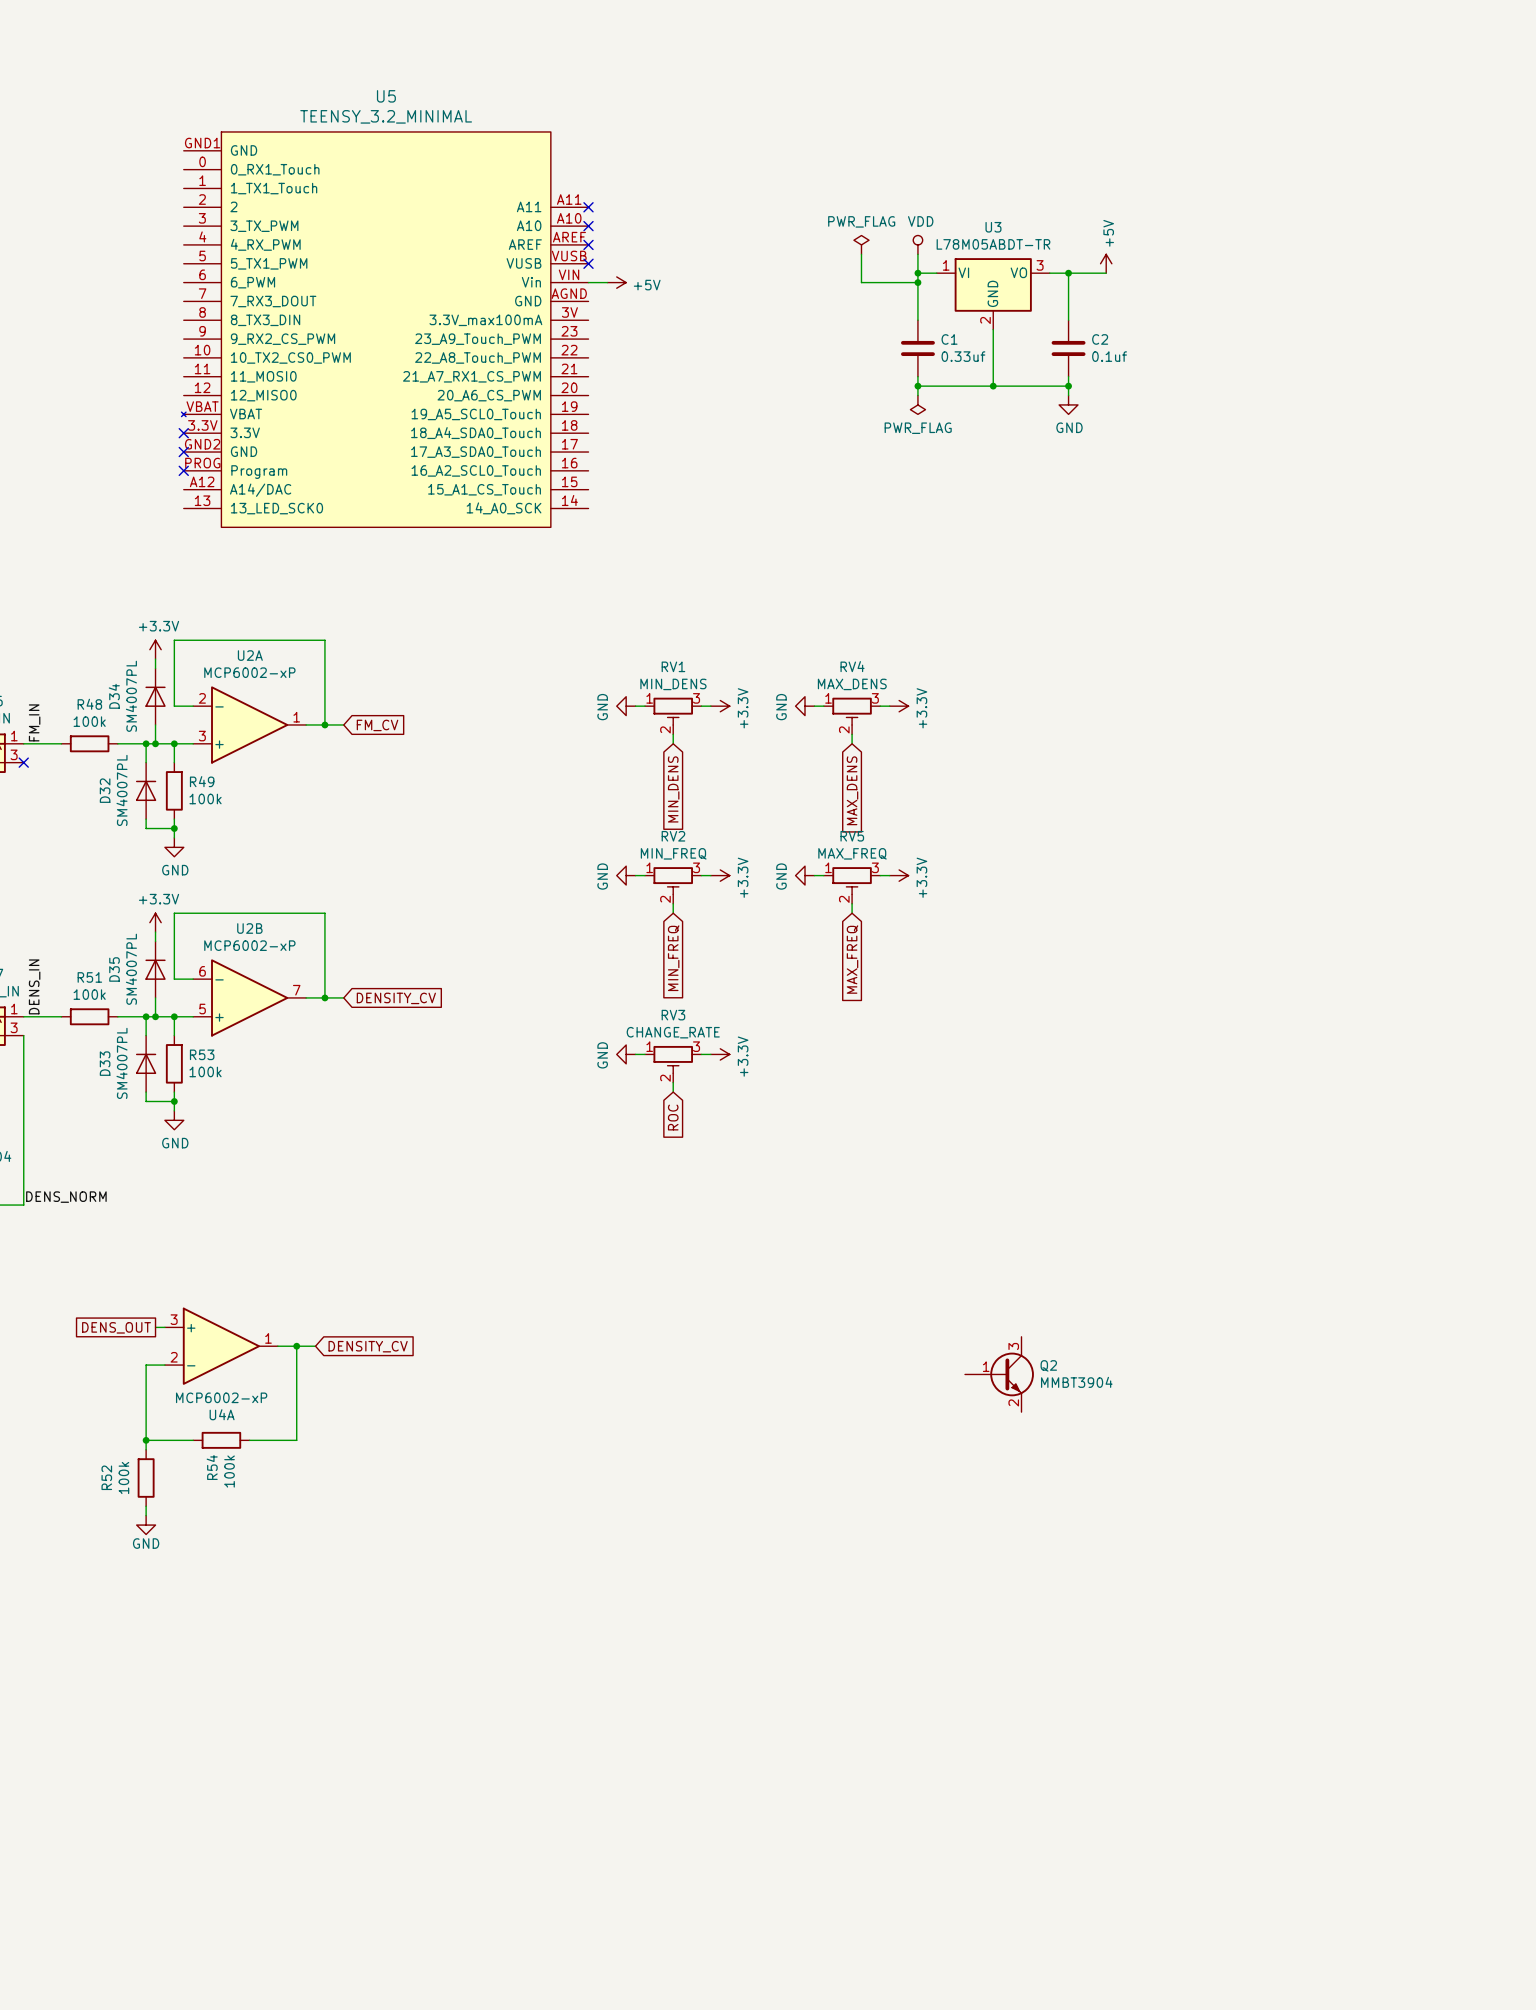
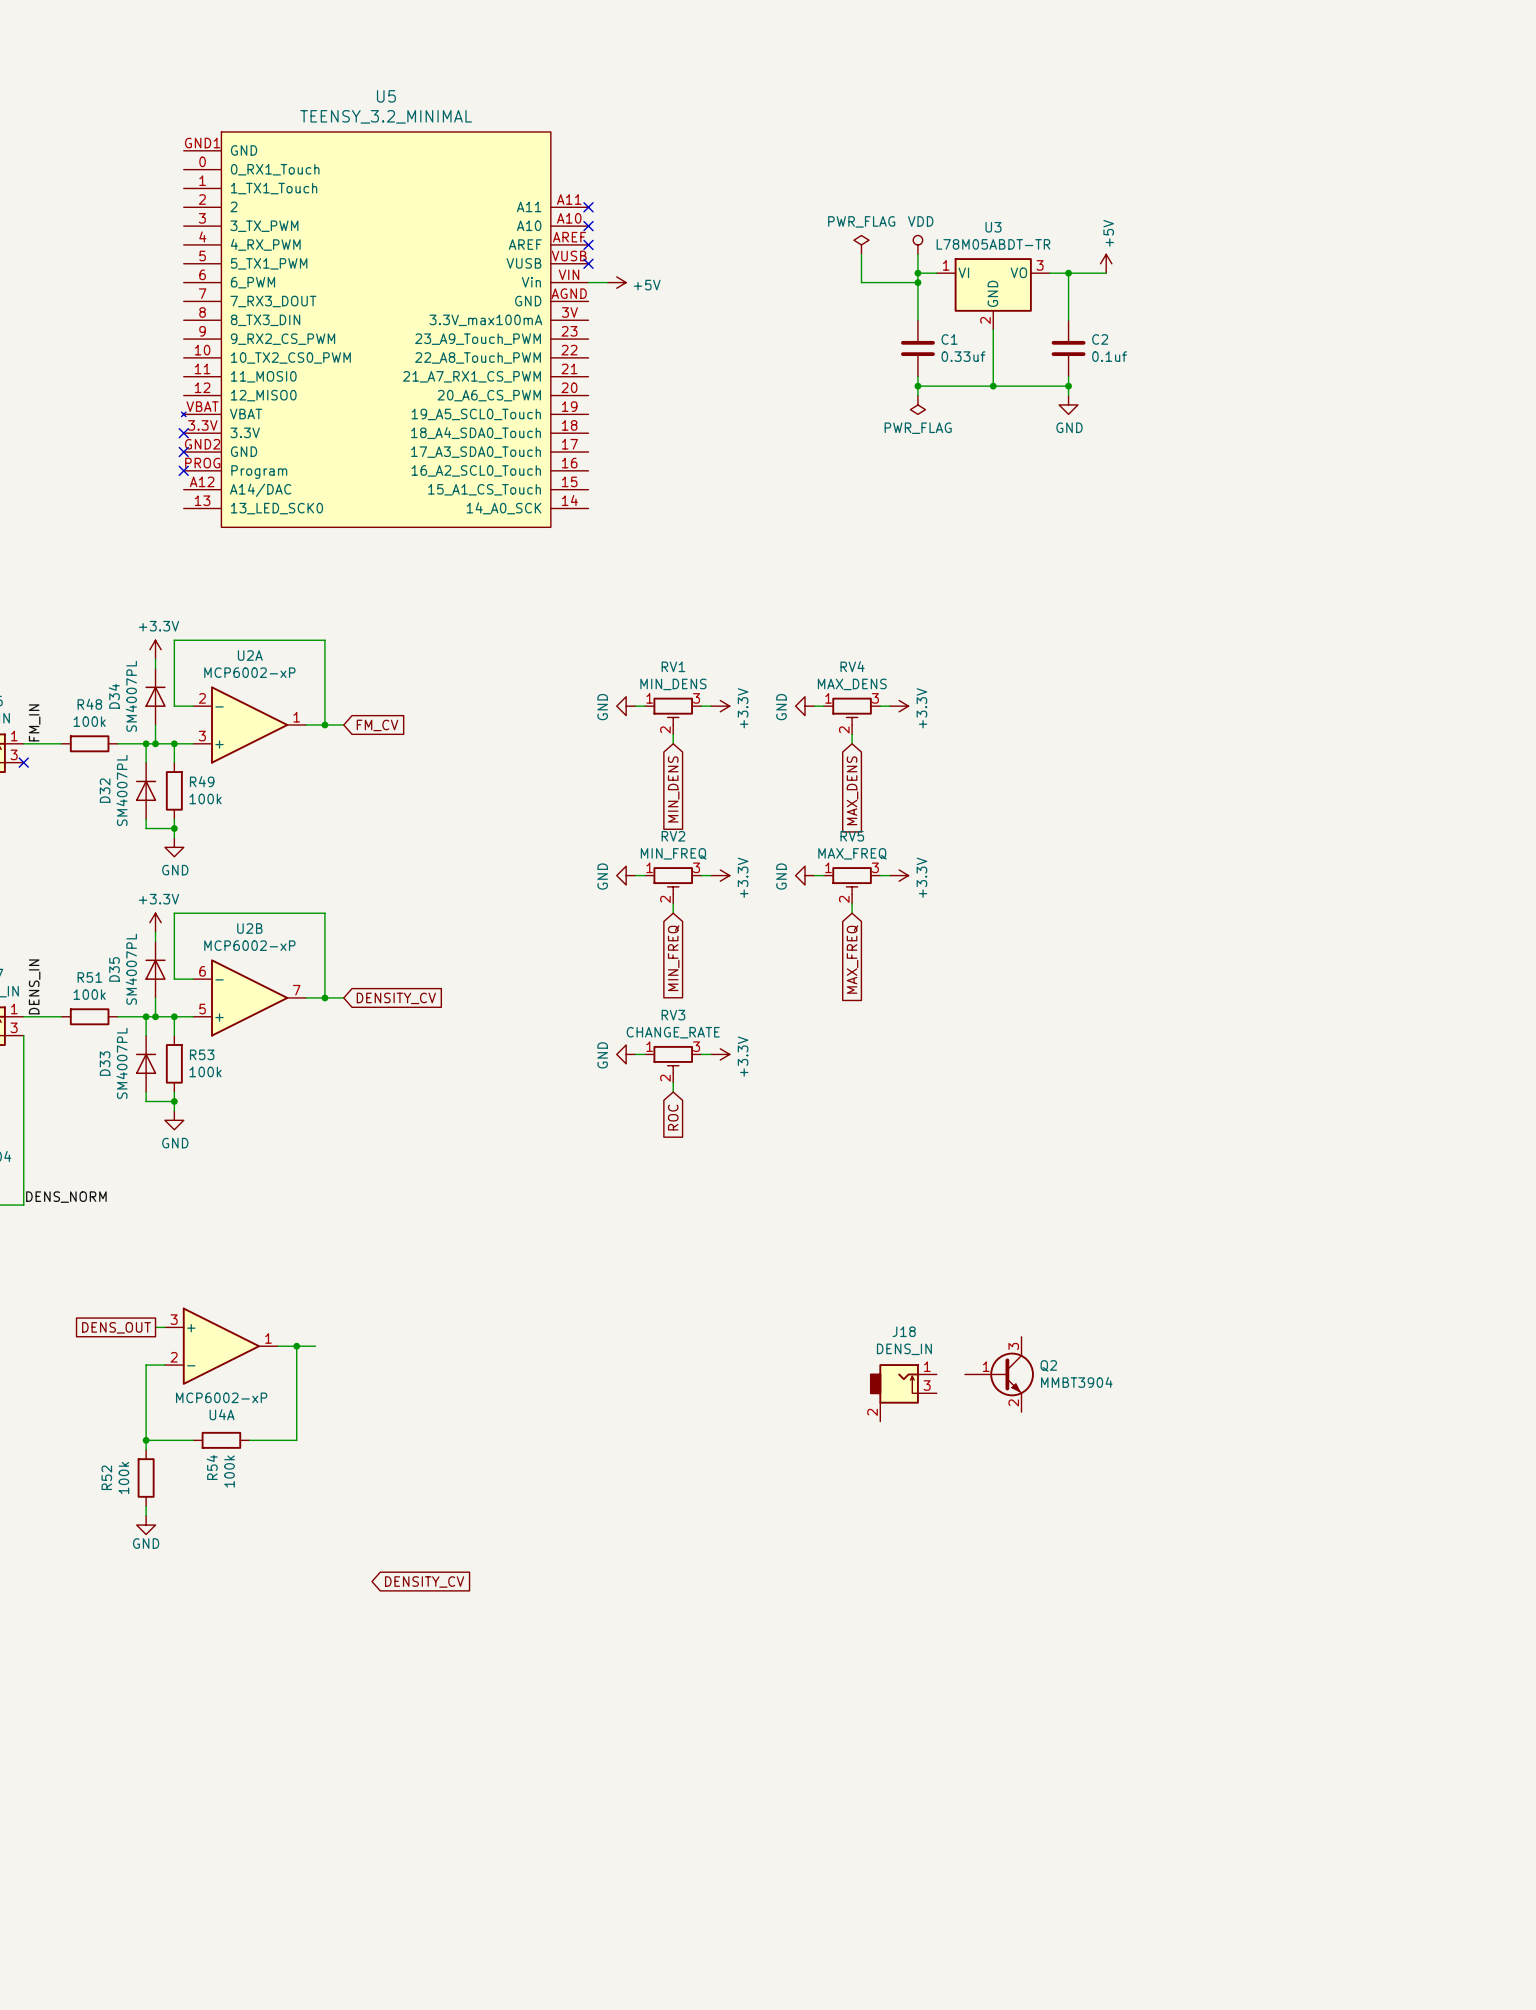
global label: DENSITY_CV (368, 1346) -> none
J18: none -> DENS_IN (903, 1392)
global label: none -> DENSITY_CV (424, 1581)

